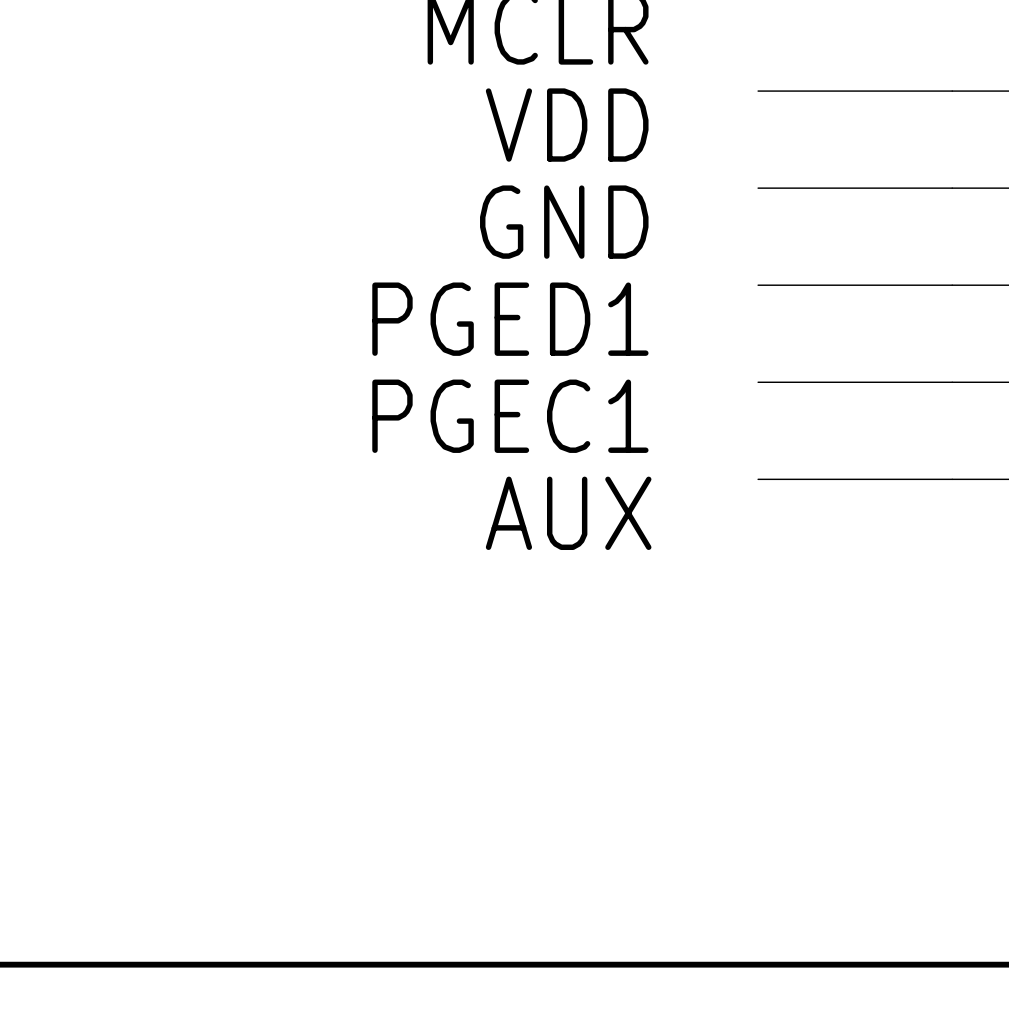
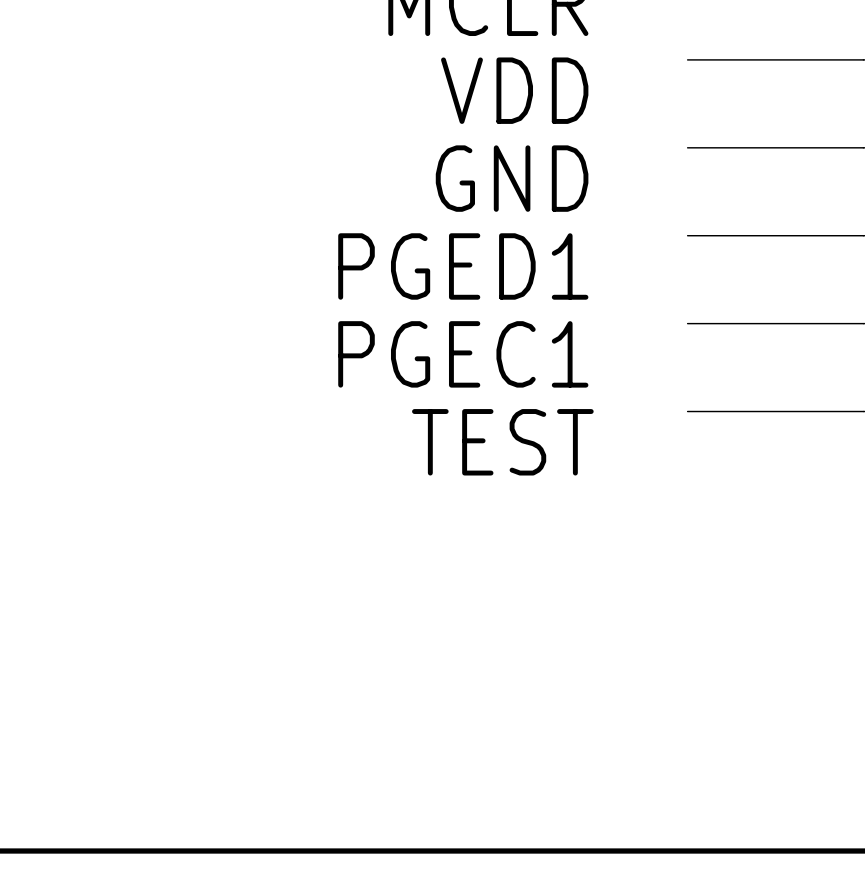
label: AUX (568, 513) -> TEST (502, 442)

